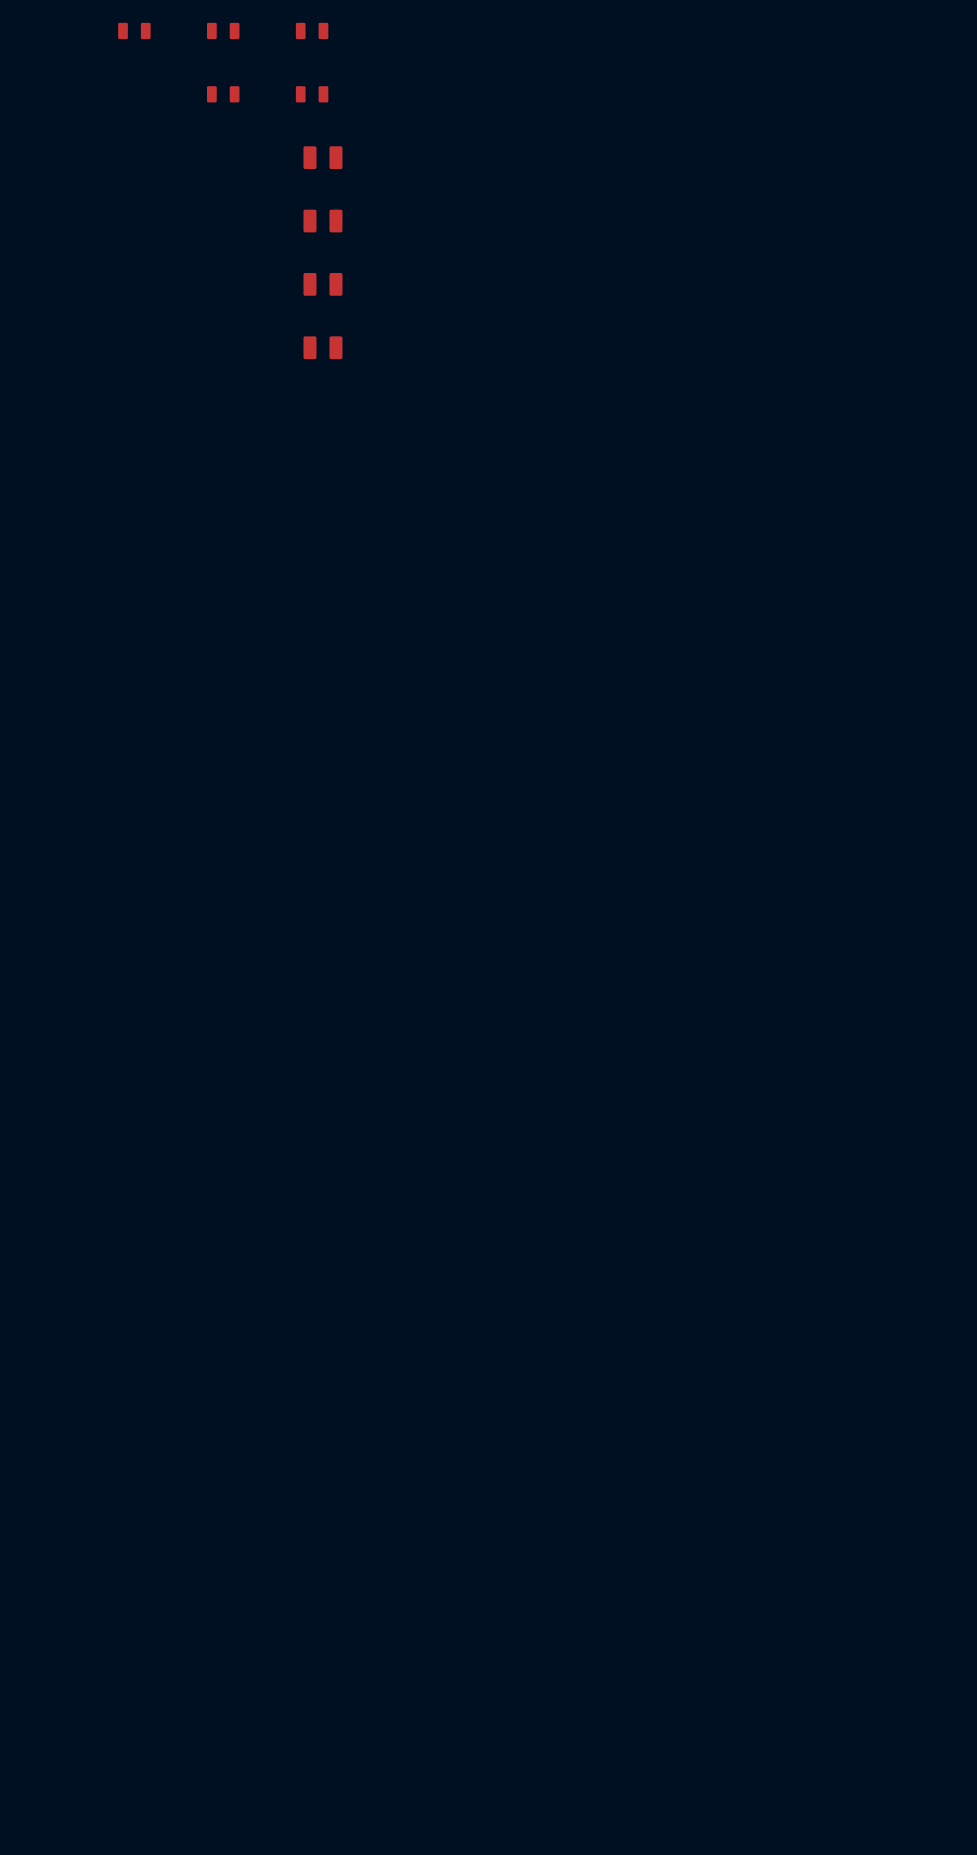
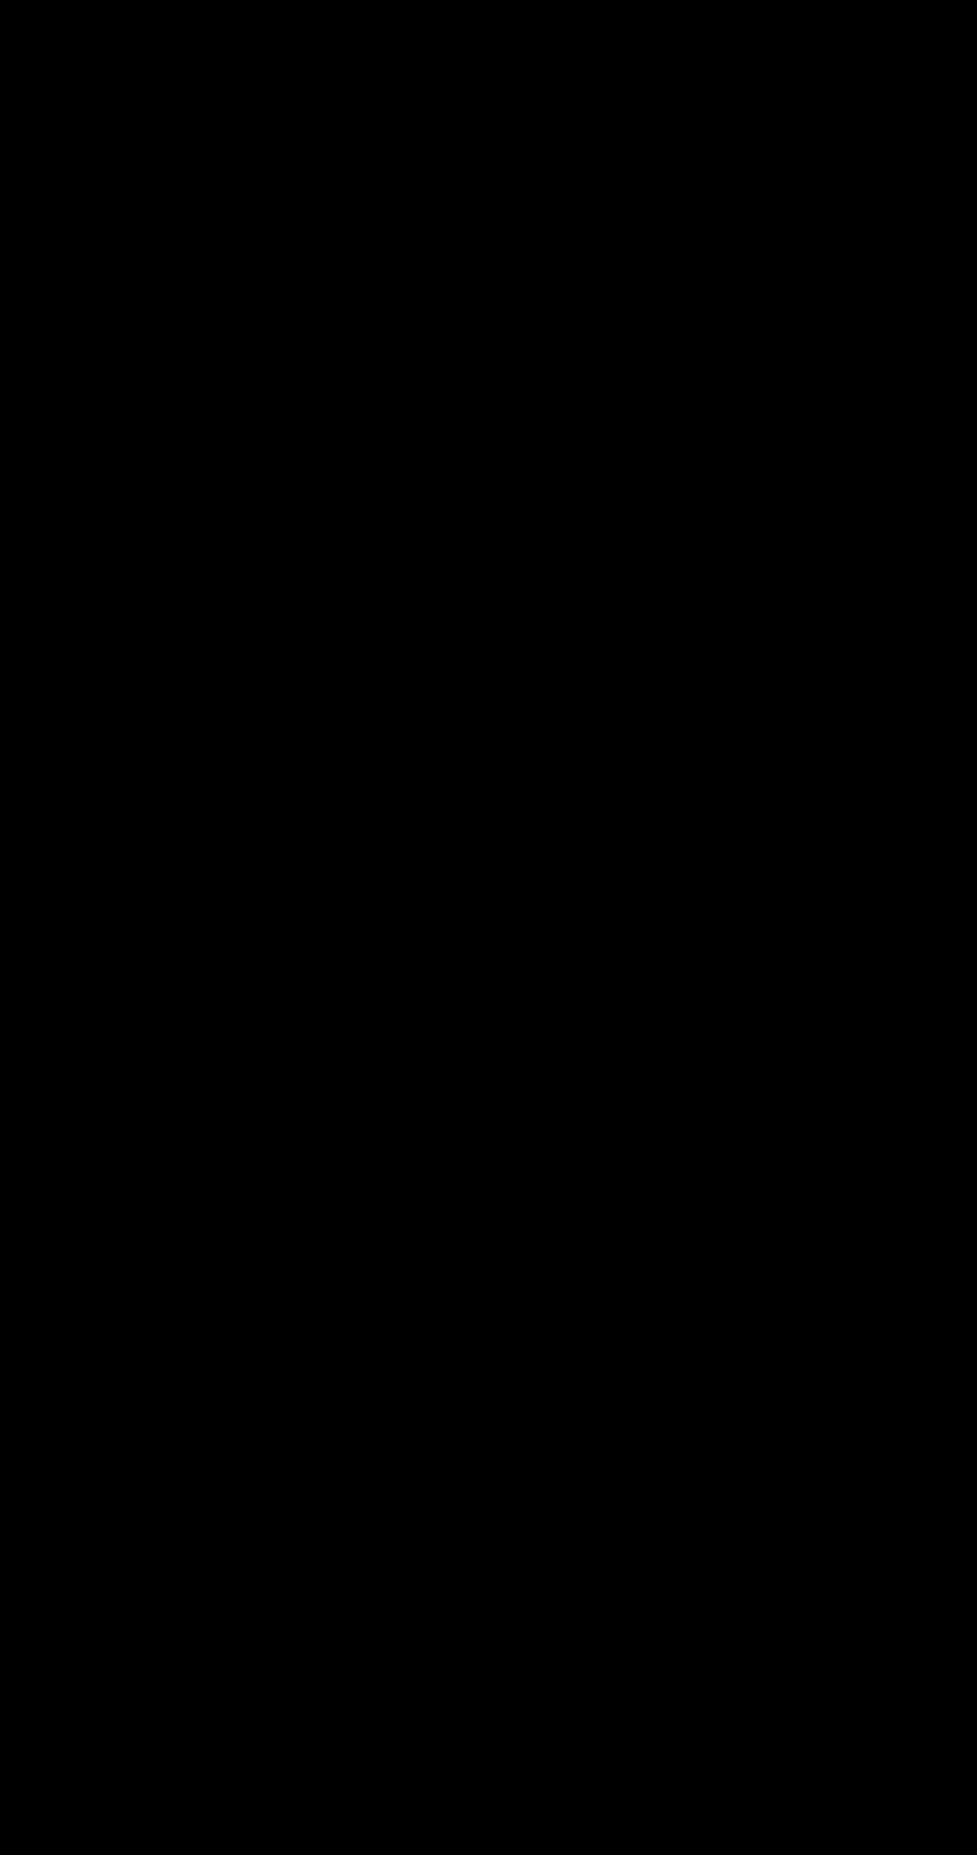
part: (134, 30) -> none
part: (223, 30) -> none
part: (312, 30) -> none
part: (223, 94) -> none
part: (312, 94) -> none
part: (322, 157) -> none
part: (322, 221) -> none
part: (322, 284) -> none
part: (322, 347) -> none

